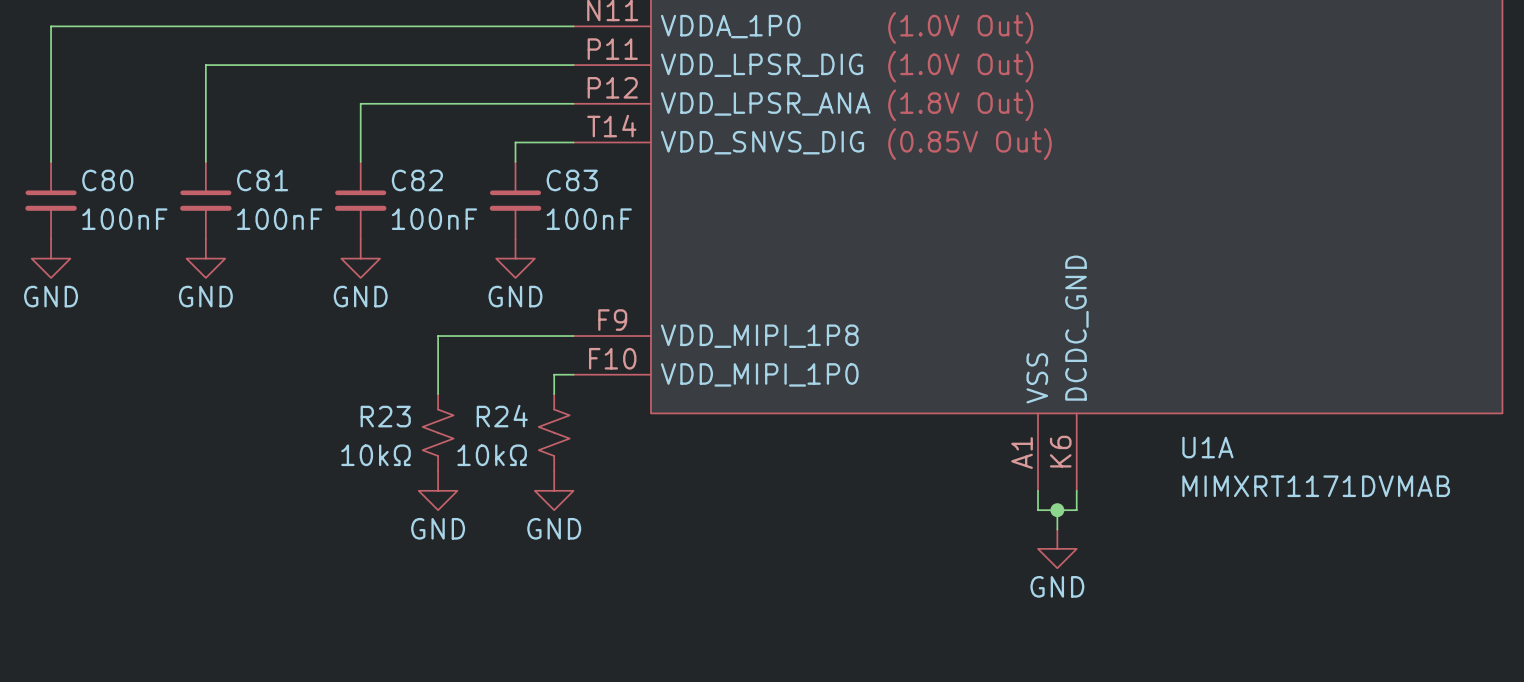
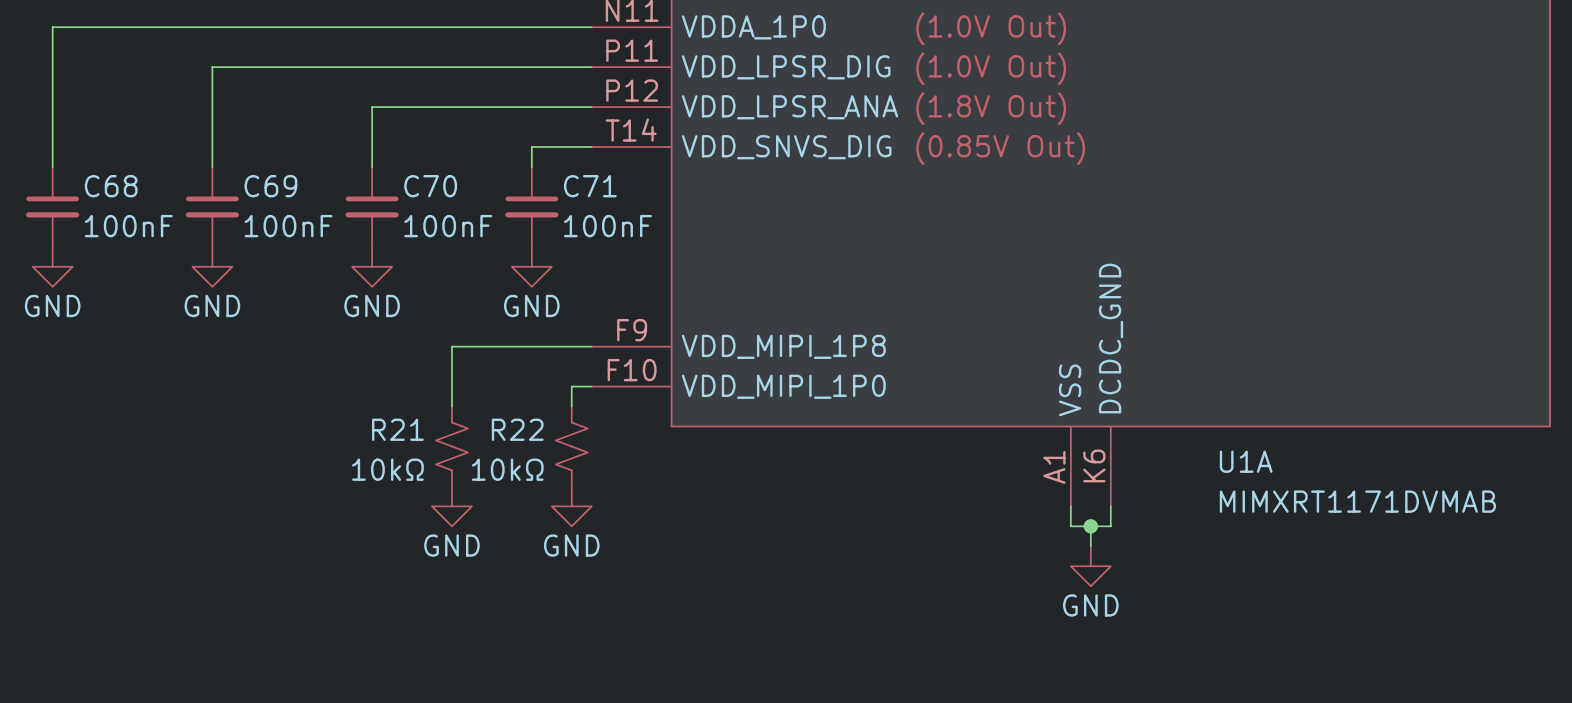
C80 name: C80 (107, 180) -> C68 (111, 186)
C81 name: C81 (262, 180) -> C69 (270, 186)
C82 name: C82 (417, 180) -> C70 (430, 186)
C83 name: C83 (572, 180) -> C71 (590, 186)
R23 name: R23 (385, 416) -> R21 (397, 429)
R24 name: R24 (502, 416) -> R22 (517, 429)

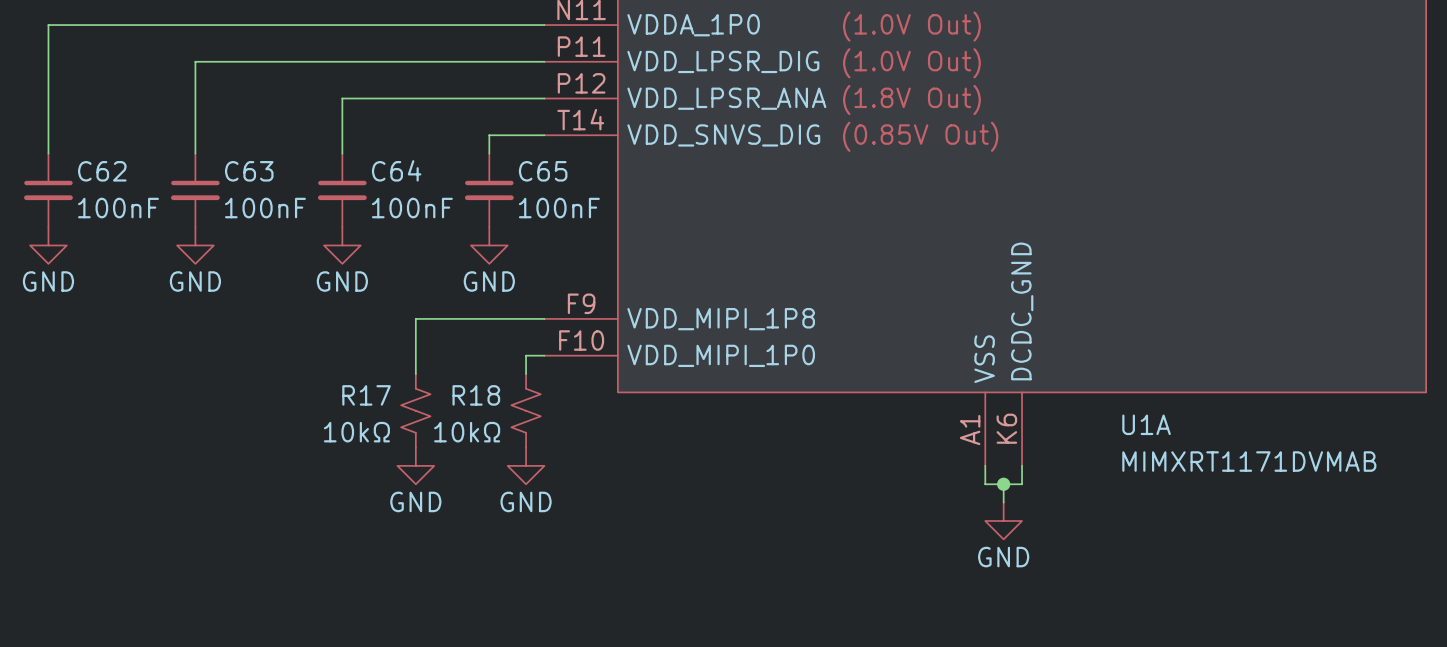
C68 name: C68 (111, 186) -> C62 (102, 171)
C69 name: C69 (270, 186) -> C63 (249, 171)
C70 name: C70 (430, 186) -> C64 (396, 170)
C71 name: C71 (590, 186) -> C65 (543, 171)
R21 name: R21 (397, 429) -> R17 (366, 395)
R22 name: R22 (517, 429) -> R18 (476, 395)

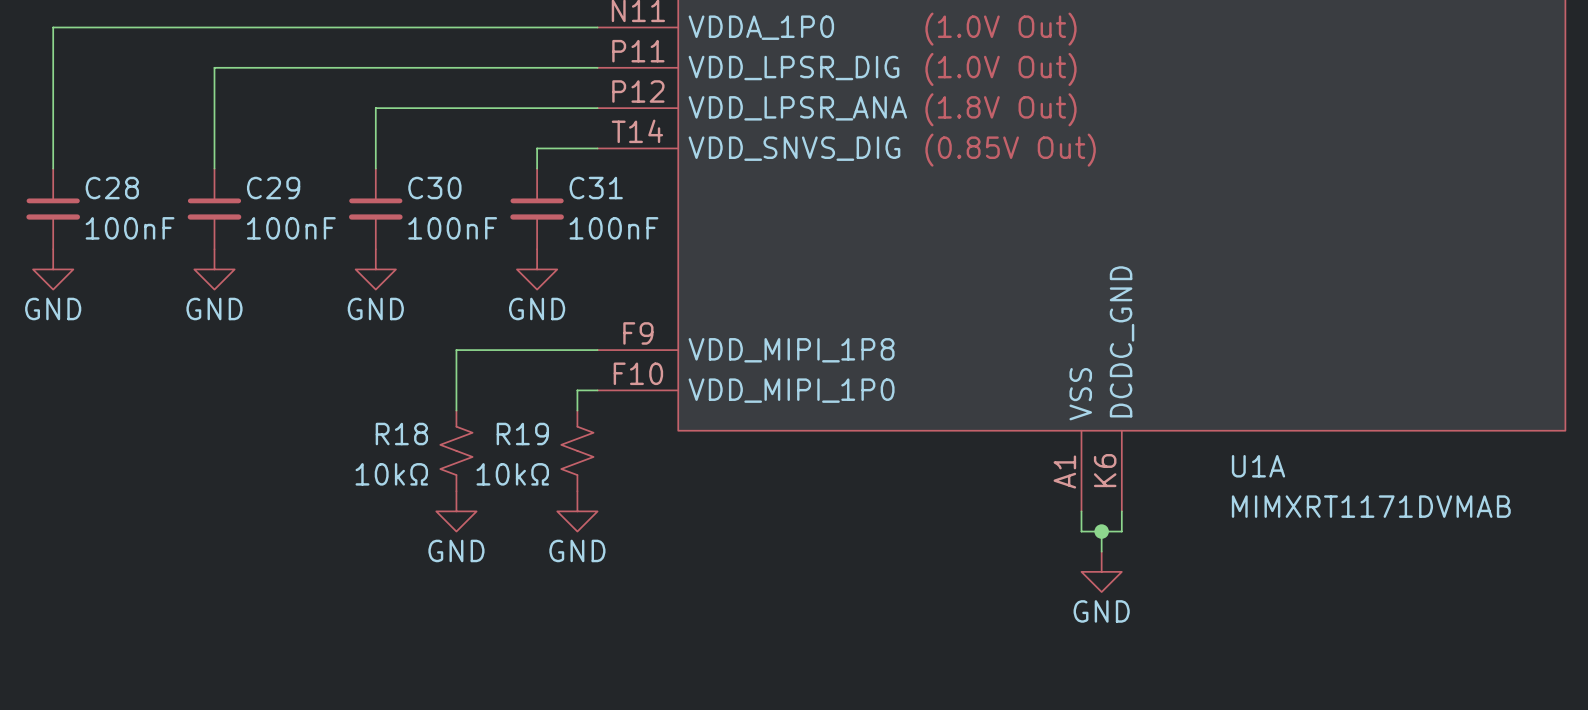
C64 name: C64 (396, 170) -> C30 (434, 188)
C62 name: C62 (102, 171) -> C28 (112, 188)
C63 name: C63 (249, 171) -> C29 (273, 188)
C65 name: C65 (543, 171) -> C31 (596, 188)
R17 name: R17 (366, 395) -> R18 (401, 434)
R18 name: R18 (476, 395) -> R19 (522, 434)

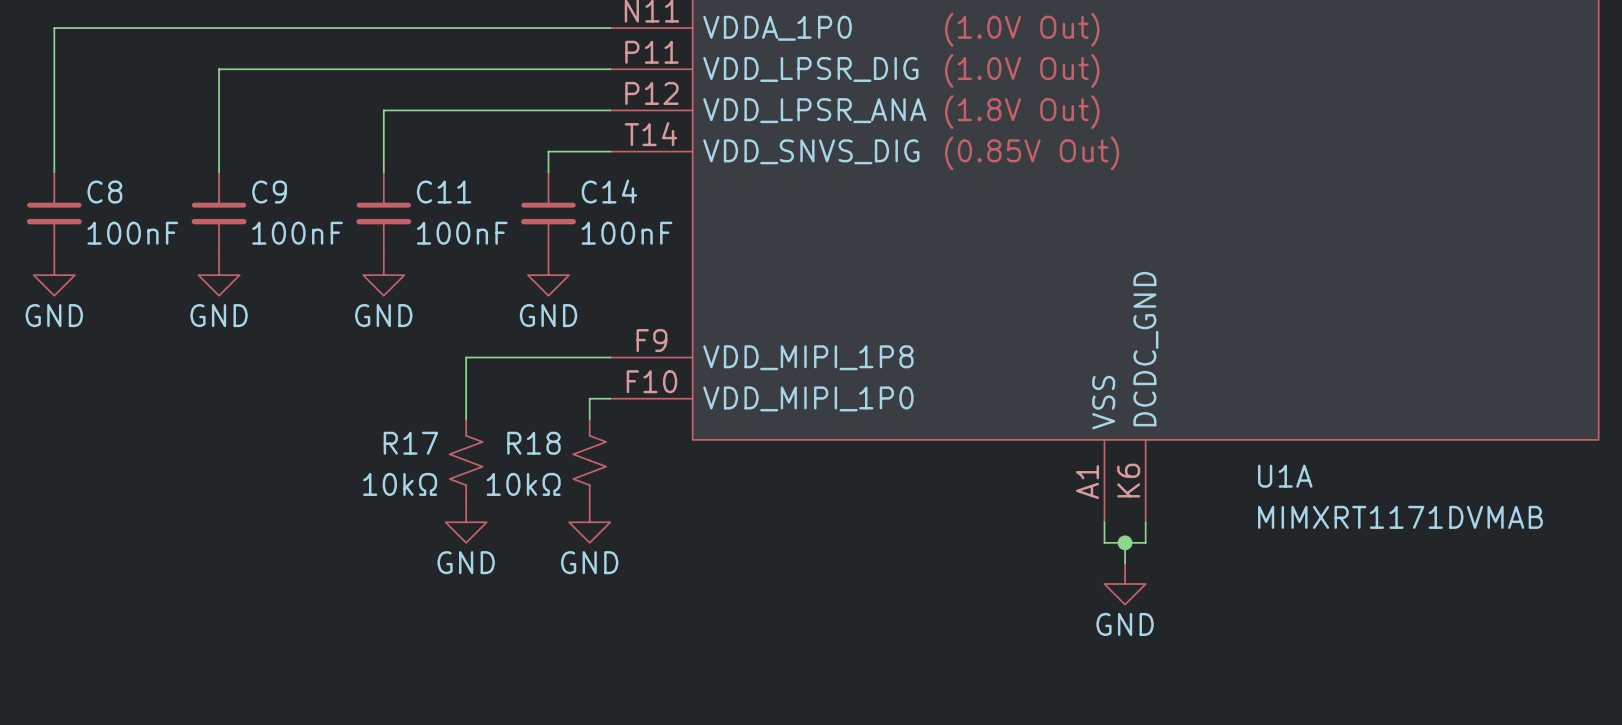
C28 name: C28 (112, 188) -> C8 (104, 192)
C29 name: C29 (273, 188) -> C9 (269, 192)
C30 name: C30 (434, 188) -> C11 (444, 192)
C31 name: C31 (596, 188) -> C14 (609, 191)
R18 name: R18 (401, 434) -> R17 (410, 443)
R19 name: R19 (522, 434) -> R18 (533, 443)

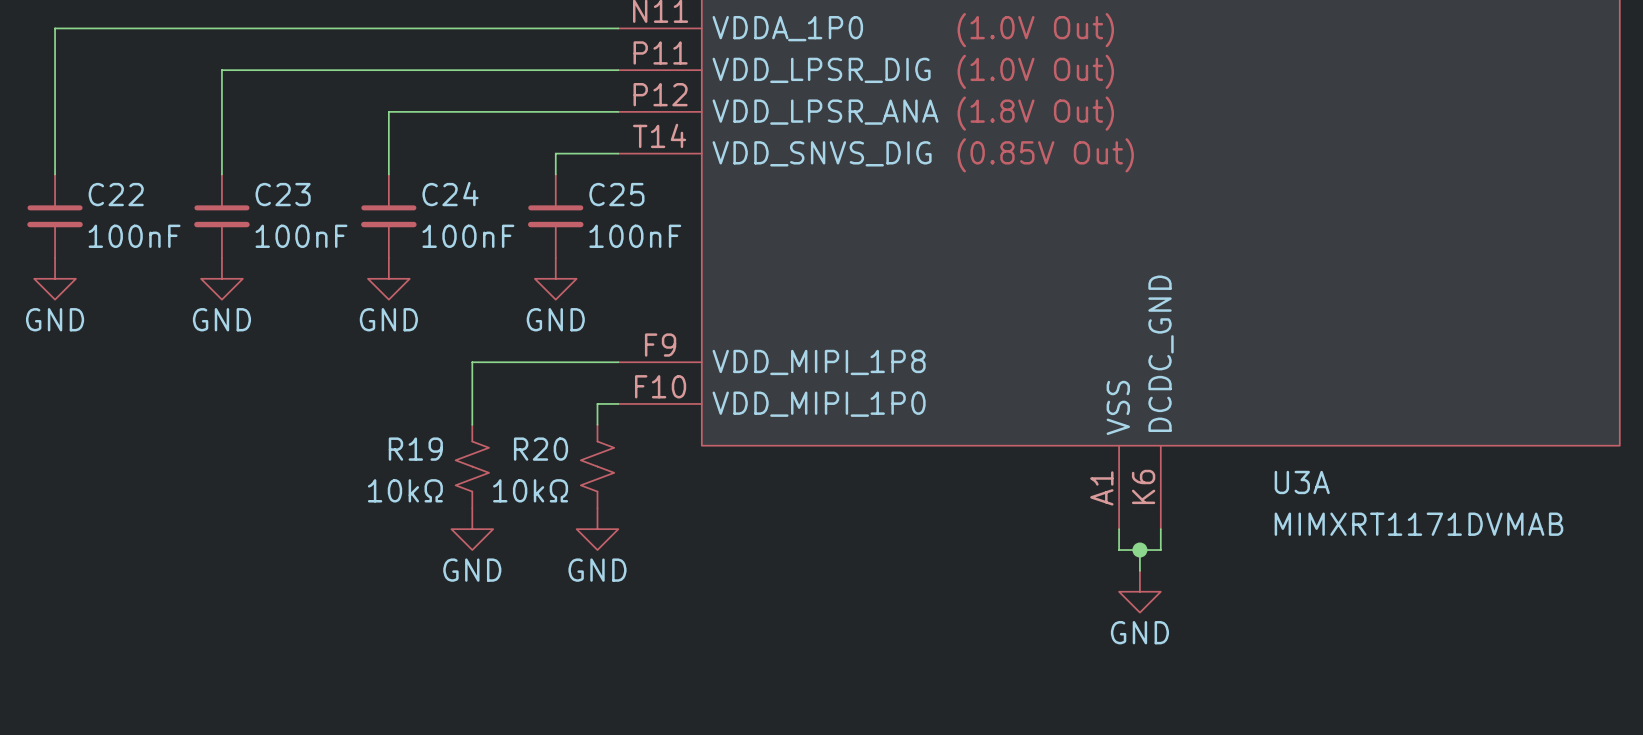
C14 name: C14 (609, 191) -> C25 (616, 194)
C8 name: C8 (104, 192) -> C22 (116, 194)
C9 name: C9 (269, 192) -> C23 (283, 194)
C11 name: C11 (444, 192) -> C24 (450, 194)
R17 name: R17 (410, 443) -> R19 (415, 449)
R18 name: R18 (533, 443) -> R20 (541, 449)
U1A name: U1A (1285, 476) -> U3A (1302, 482)

